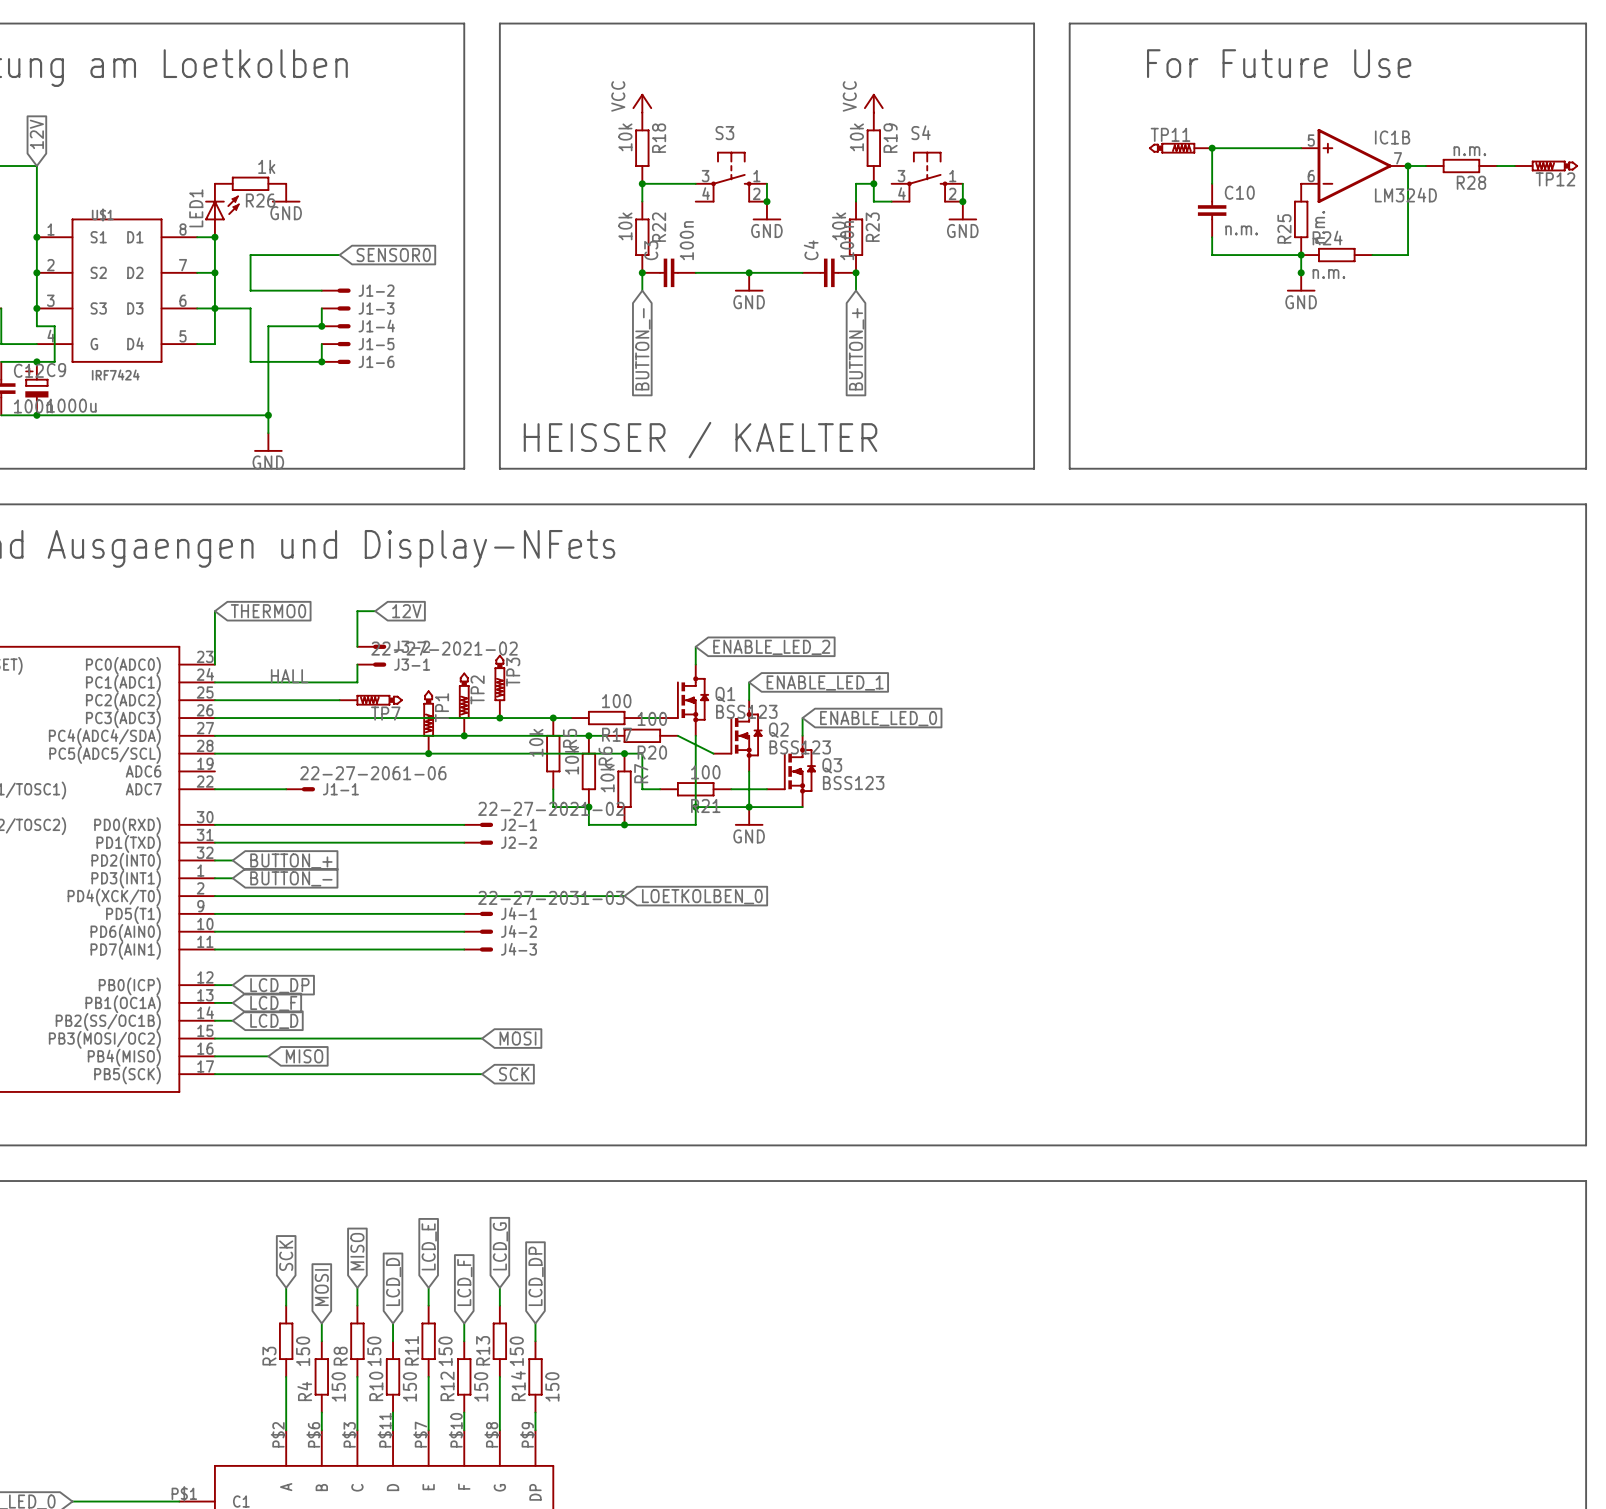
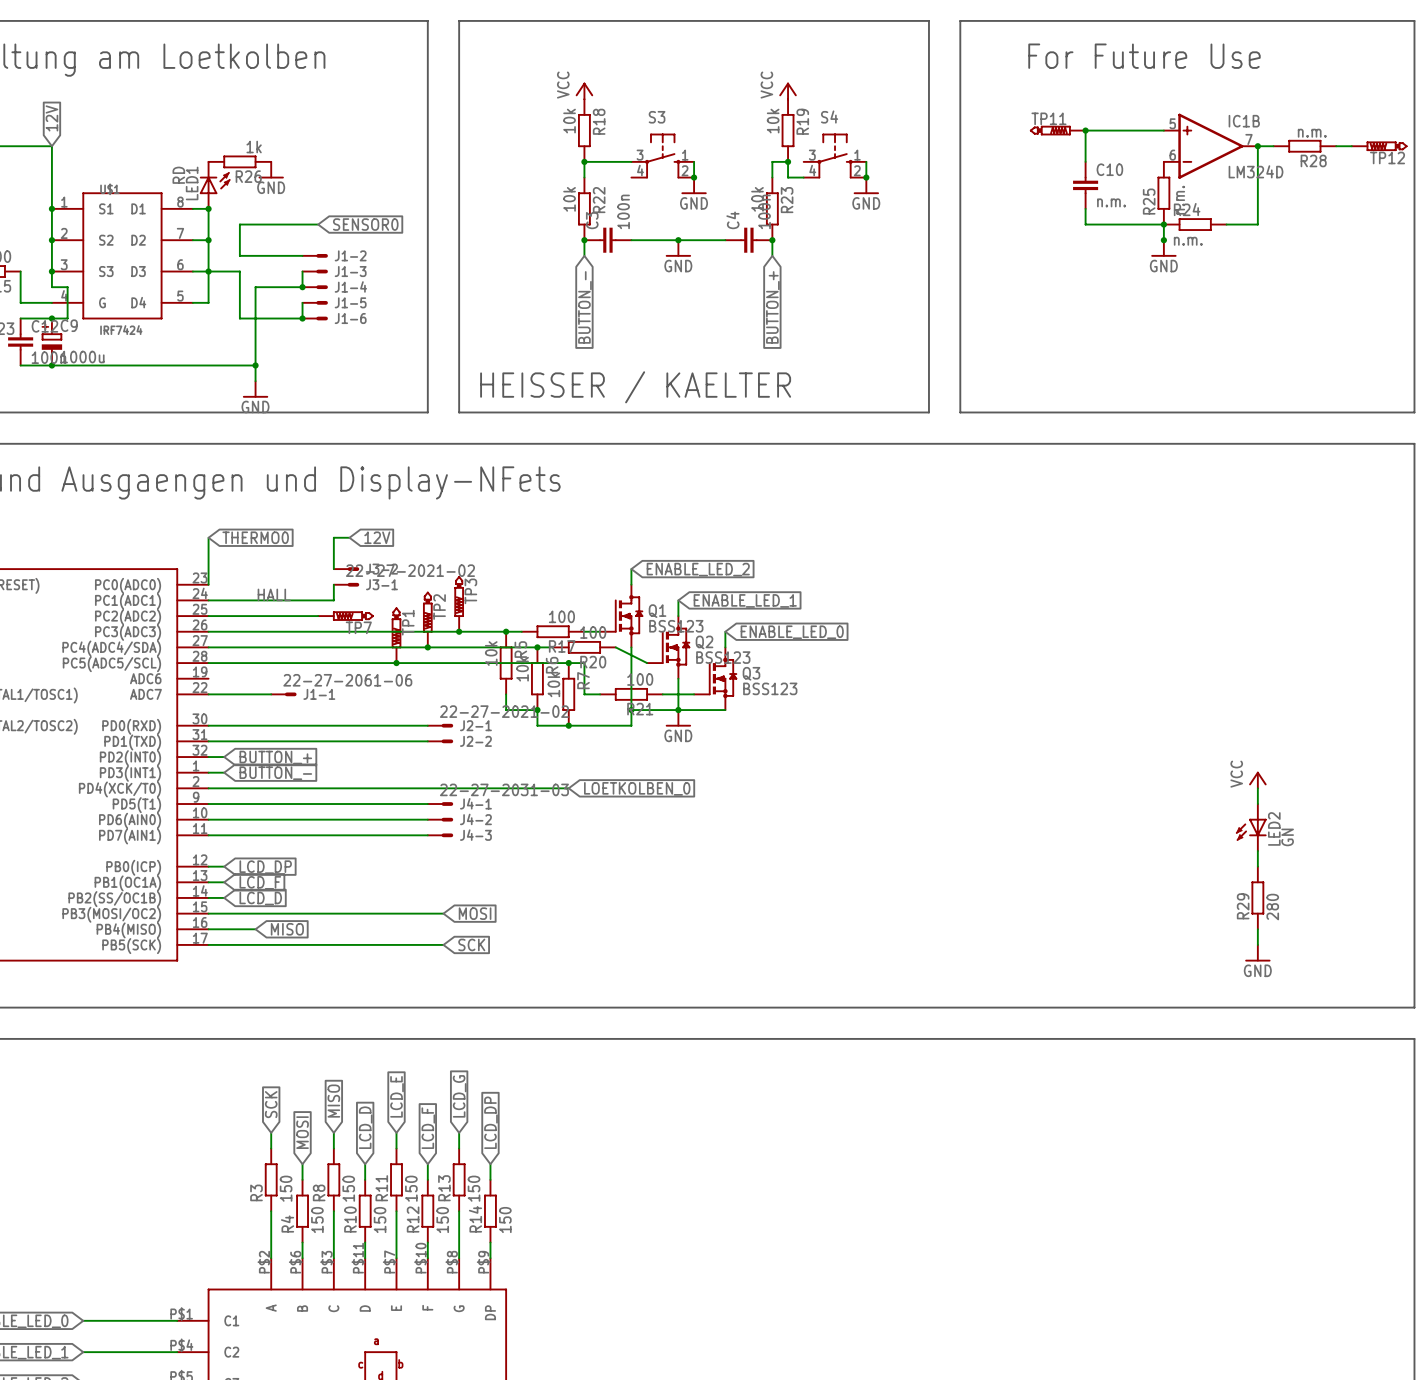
LED1 value: none -> RD (178, 175)
power symbol: none -> VCC (1257, 780)
wire: none -> (1257, 788) (1257, 804)
LED2: none -> GN (1251, 827)
wire: none -> (1257, 850) (1257, 866)
R29: none -> 280 (1257, 897)
wire: none -> (1257, 929) (1257, 944)
power symbol: none -> GND (1257, 953)

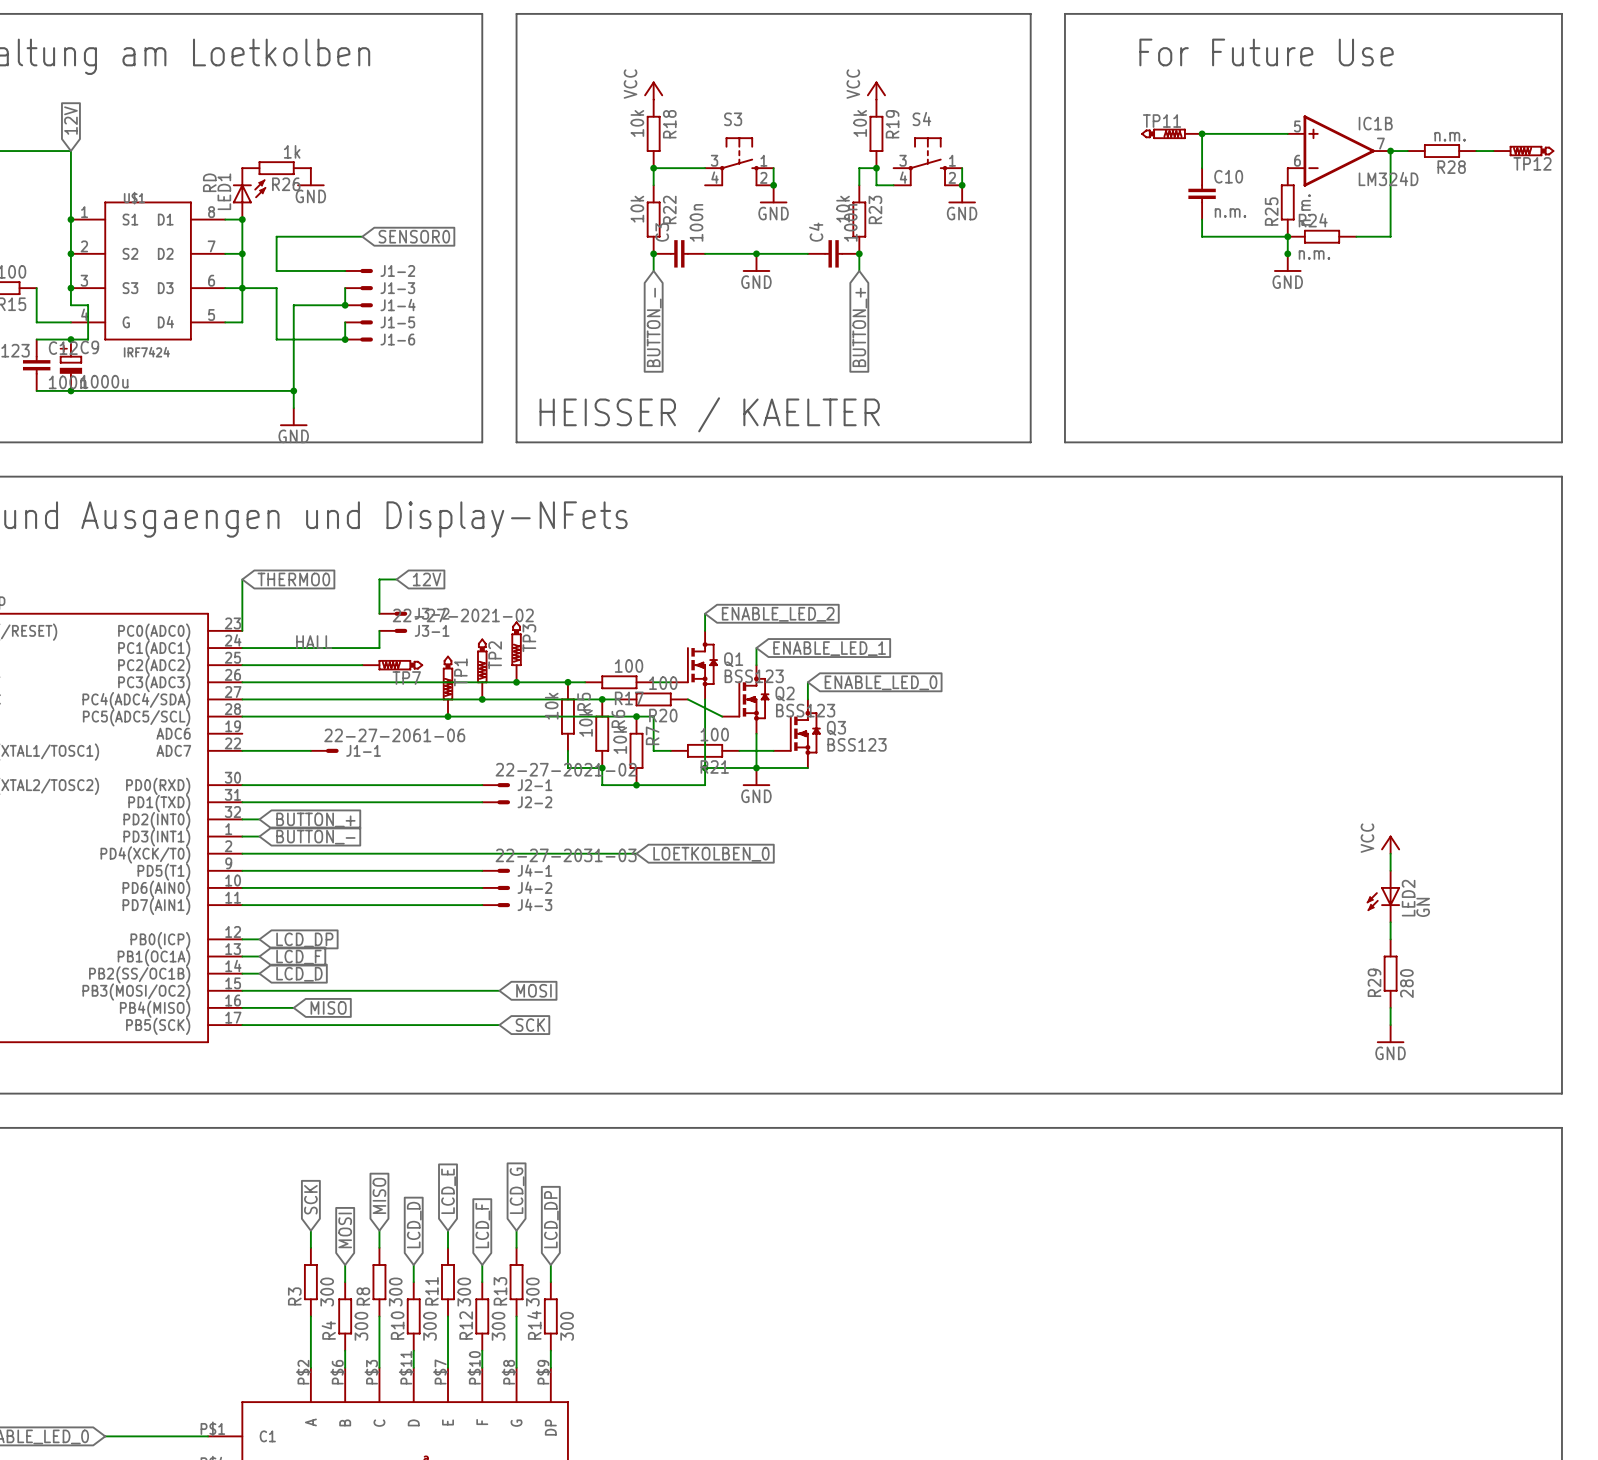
R3 value: 150 (286, 1188) -> 300 (327, 1292)
R8 value: 150 (348, 1188) -> 300 (395, 1292)
R11 value: 150 (411, 1188) -> 300 (464, 1292)
R13 value: 150 (474, 1188) -> 300 (532, 1292)
R4 value: 150 (317, 1220) -> 300 (361, 1326)
R10 value: 150 (380, 1220) -> 300 (430, 1326)
R12 value: 150 (442, 1220) -> 300 (498, 1326)
R14 value: 150 (505, 1220) -> 300 (567, 1326)

